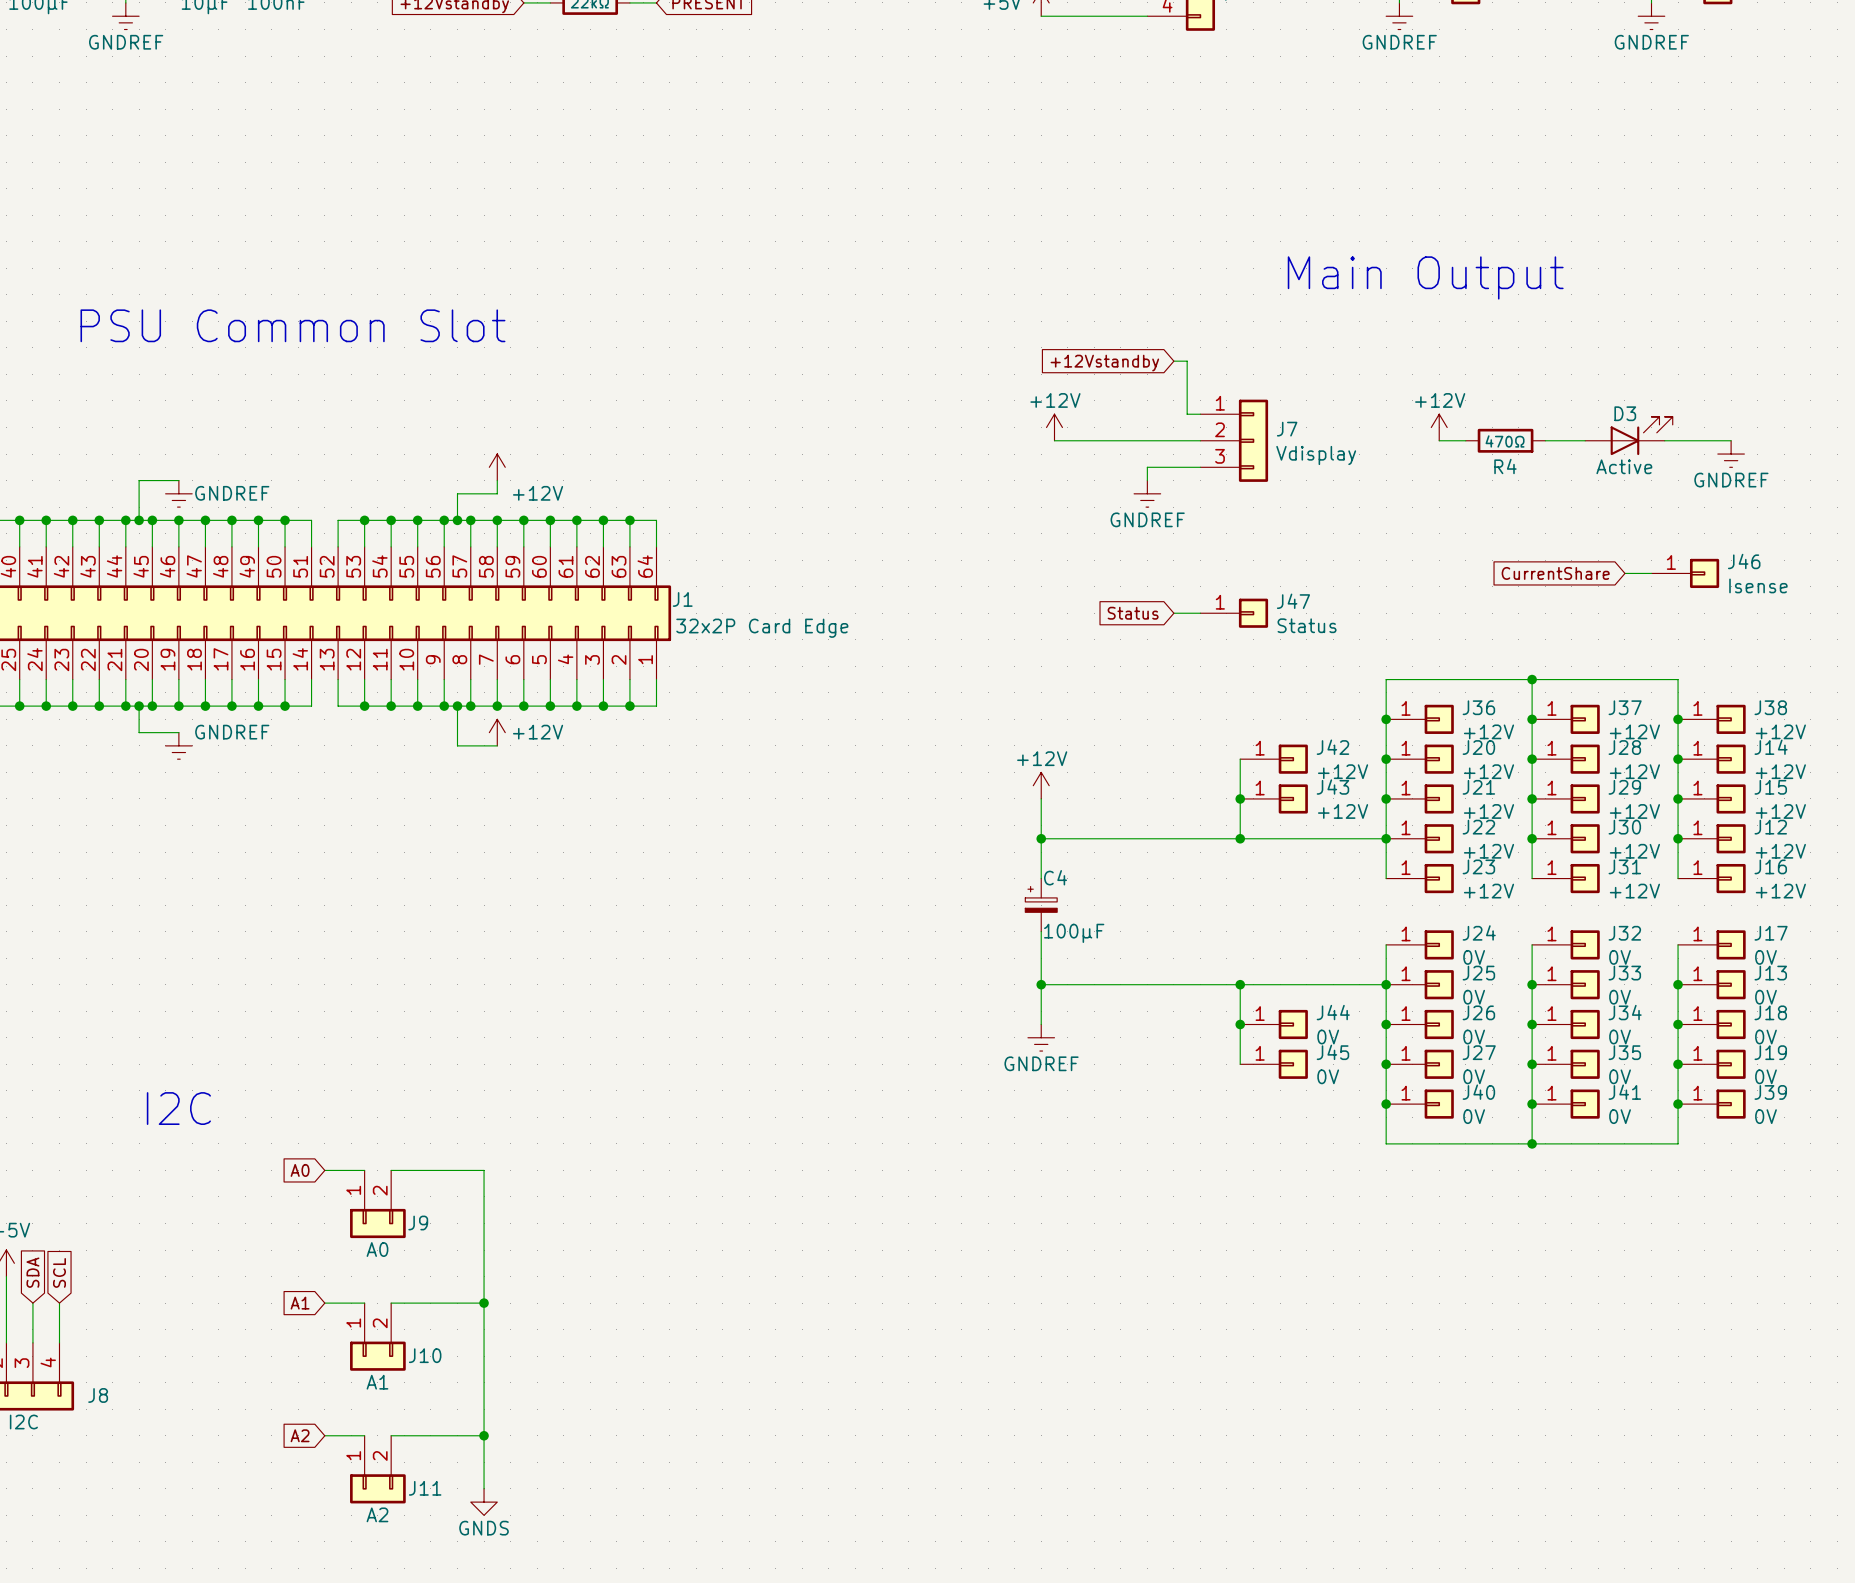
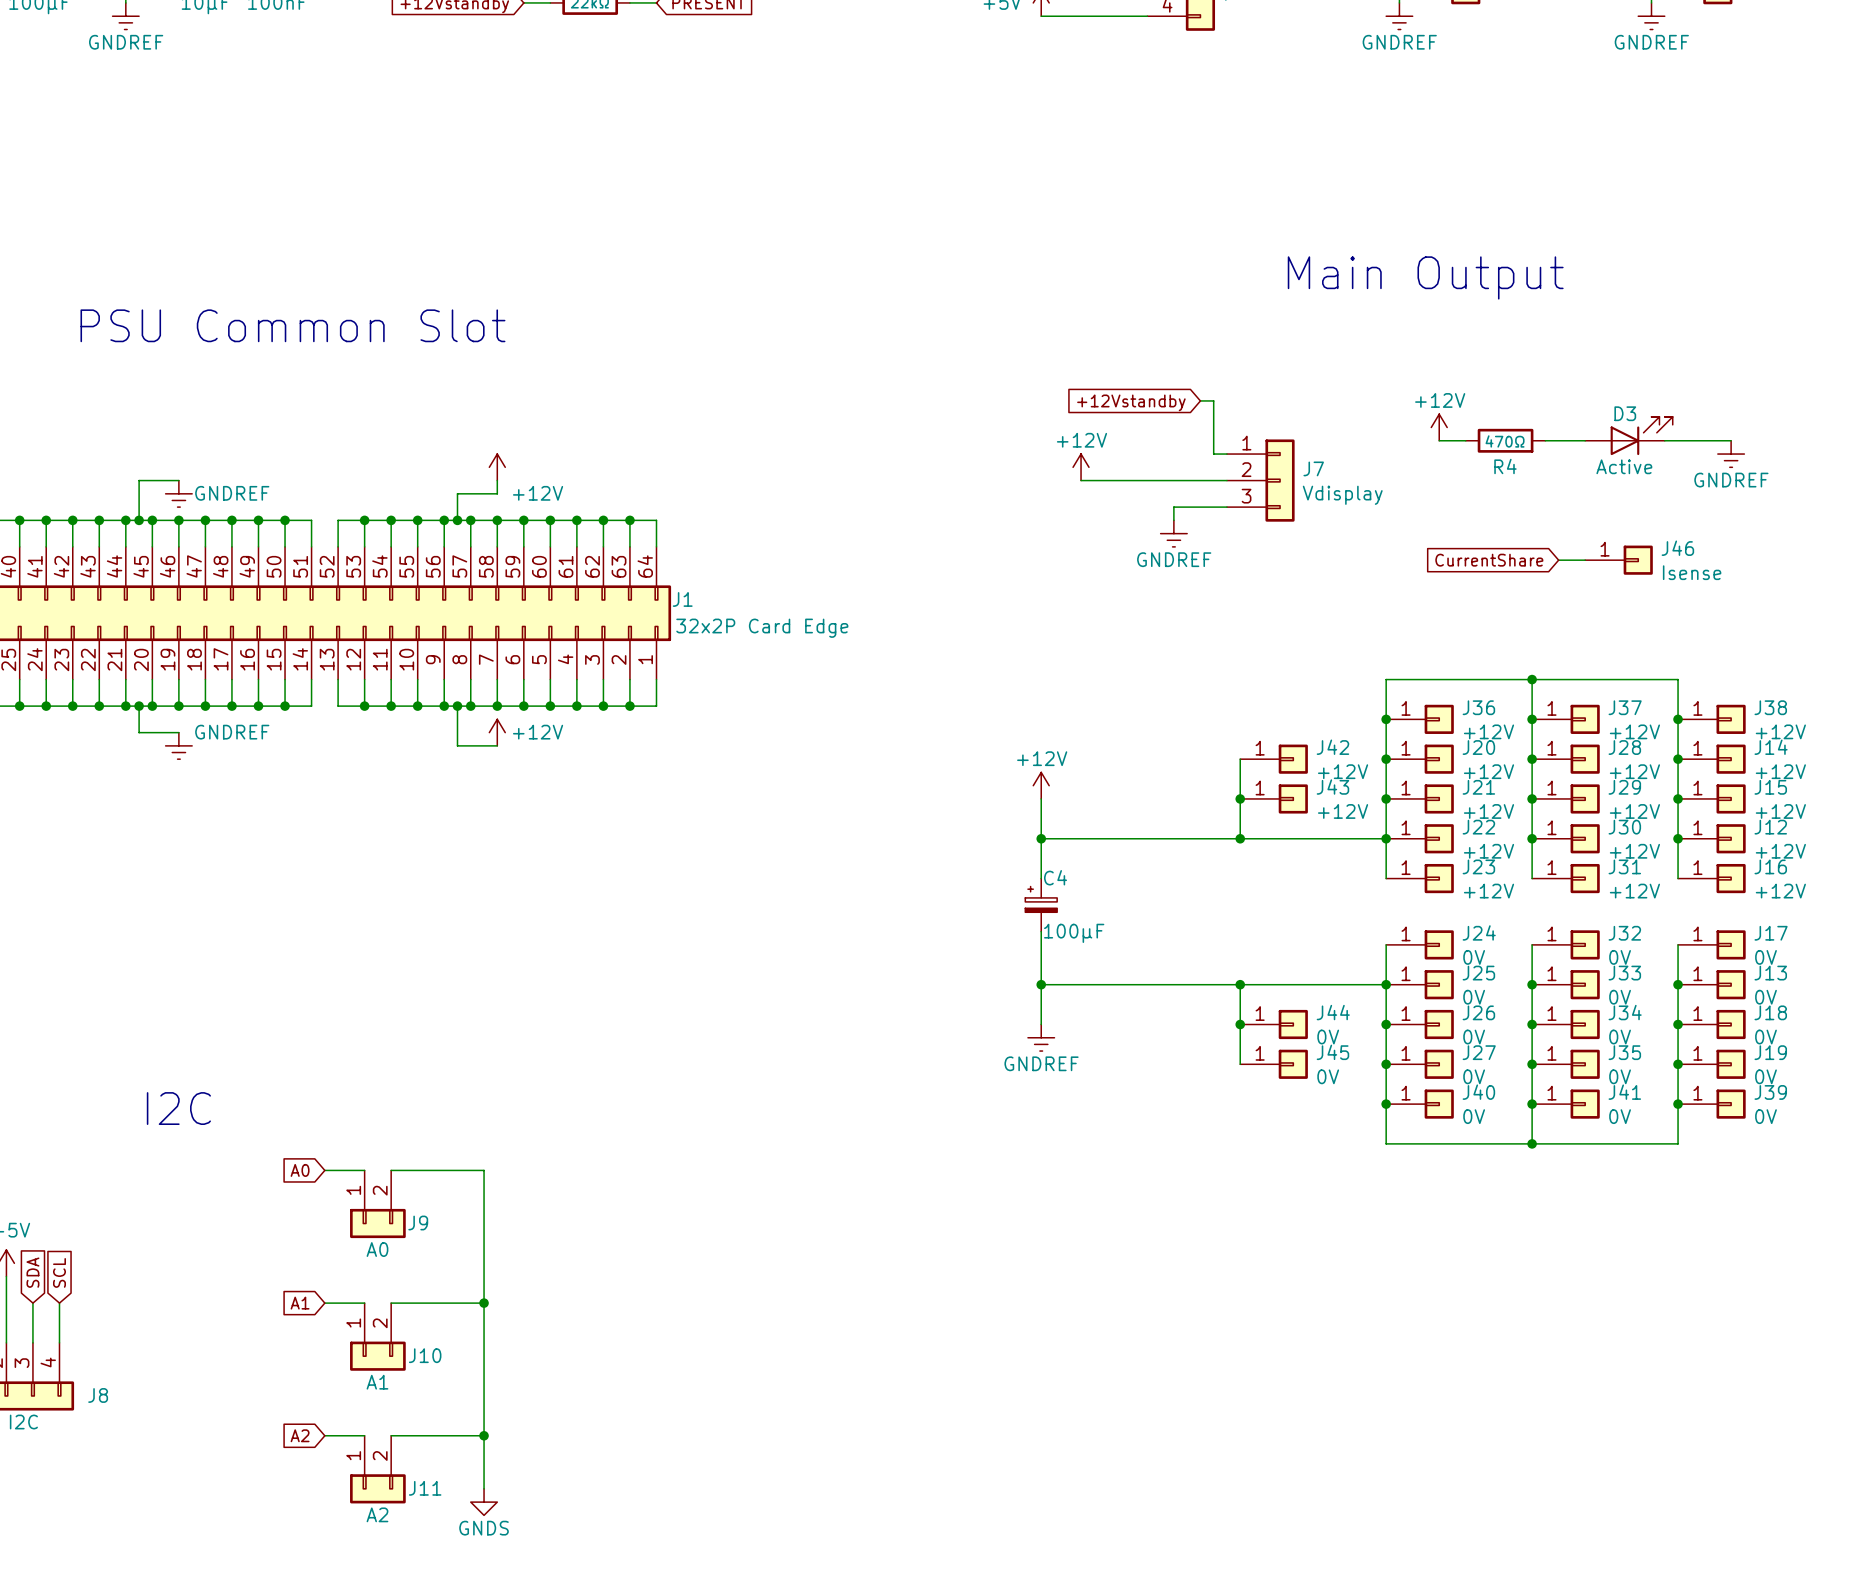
wire: (1173, 361) (1187, 361) (1187, 414) (1200, 414) -> (1200, 400) (1213, 400) (1213, 454) (1226, 454)
global label position: +12Vstandby (1104, 363) -> +12Vstandby (1131, 402)
power symbol position: +12V (1054, 427) -> +12V (1081, 467)
wire: (1054, 440) (1200, 440) -> (1081, 480) (1226, 480)
J7 position: (1234, 440) -> (1260, 480)
wire: (1200, 467) (1147, 467) (1147, 480) -> (1226, 507) (1173, 507) (1173, 520)
power symbol position: GNDREF (1147, 493) -> GNDREF (1173, 533)
global label position: CurrentShare (1555, 573) -> CurrentShare (1489, 560)
J46 position: (1685, 573) -> (1618, 560)
global label: Status (1133, 613) -> none
wire: (1173, 613) (1200, 613) -> none
J47: Status (1234, 613) -> none

